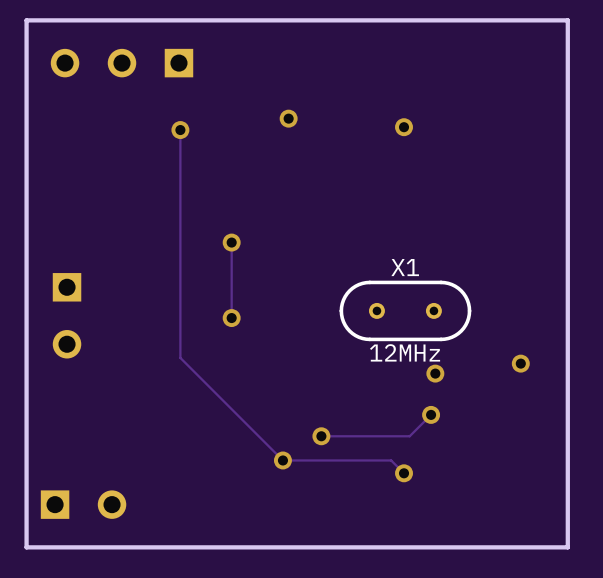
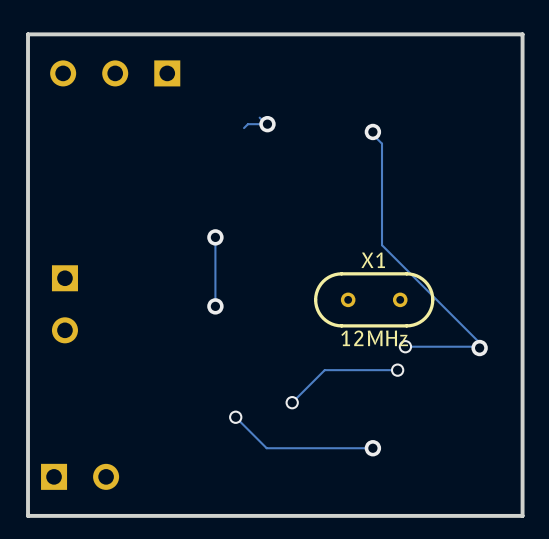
track: none -> (259, 117) (266, 124) (247, 124) (244, 128)
track: none -> (370, 131) (382, 143) (382, 245) (483, 346) (405, 346)
track: (180, 130) (180, 357) (282, 460) (391, 460) (404, 473) -> none
via: (180, 130) -> none
via: none -> (405, 346)
via: (435, 373) -> none
track: none -> (397, 370) (324, 370) (292, 402)
via: none -> (397, 370)
track: (431, 414) (409, 436) (321, 436) -> none
via: (431, 414) -> none
via: none -> (292, 402)
via: (321, 436) -> none
track: none -> (235, 417) (266, 448) (371, 448)
via: none -> (235, 417)
via: (282, 460) -> none

